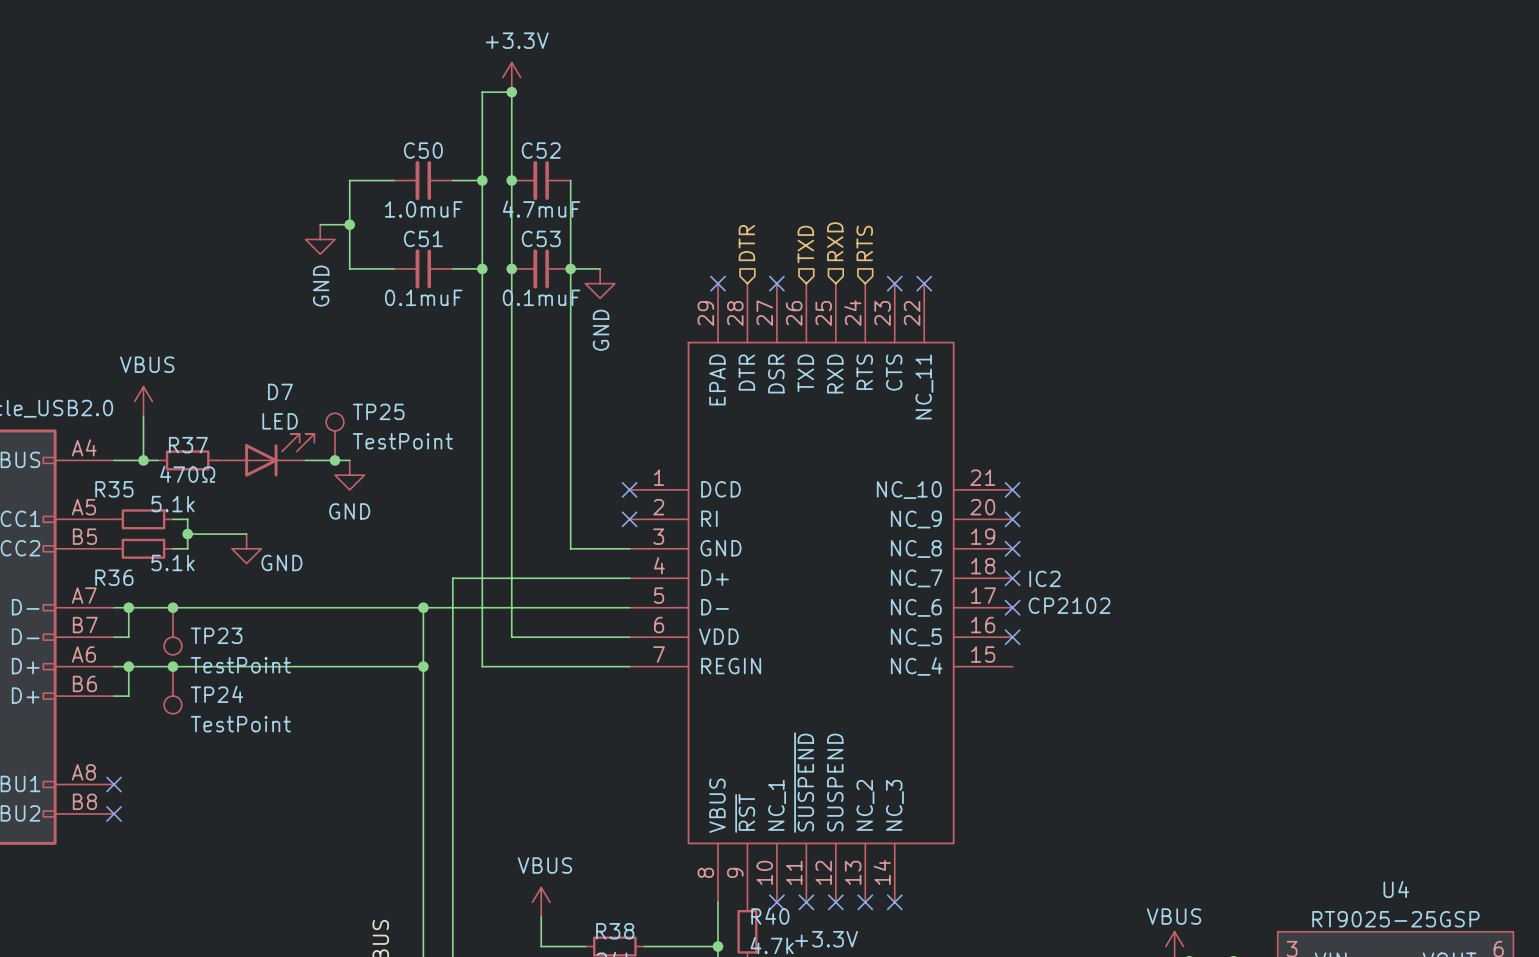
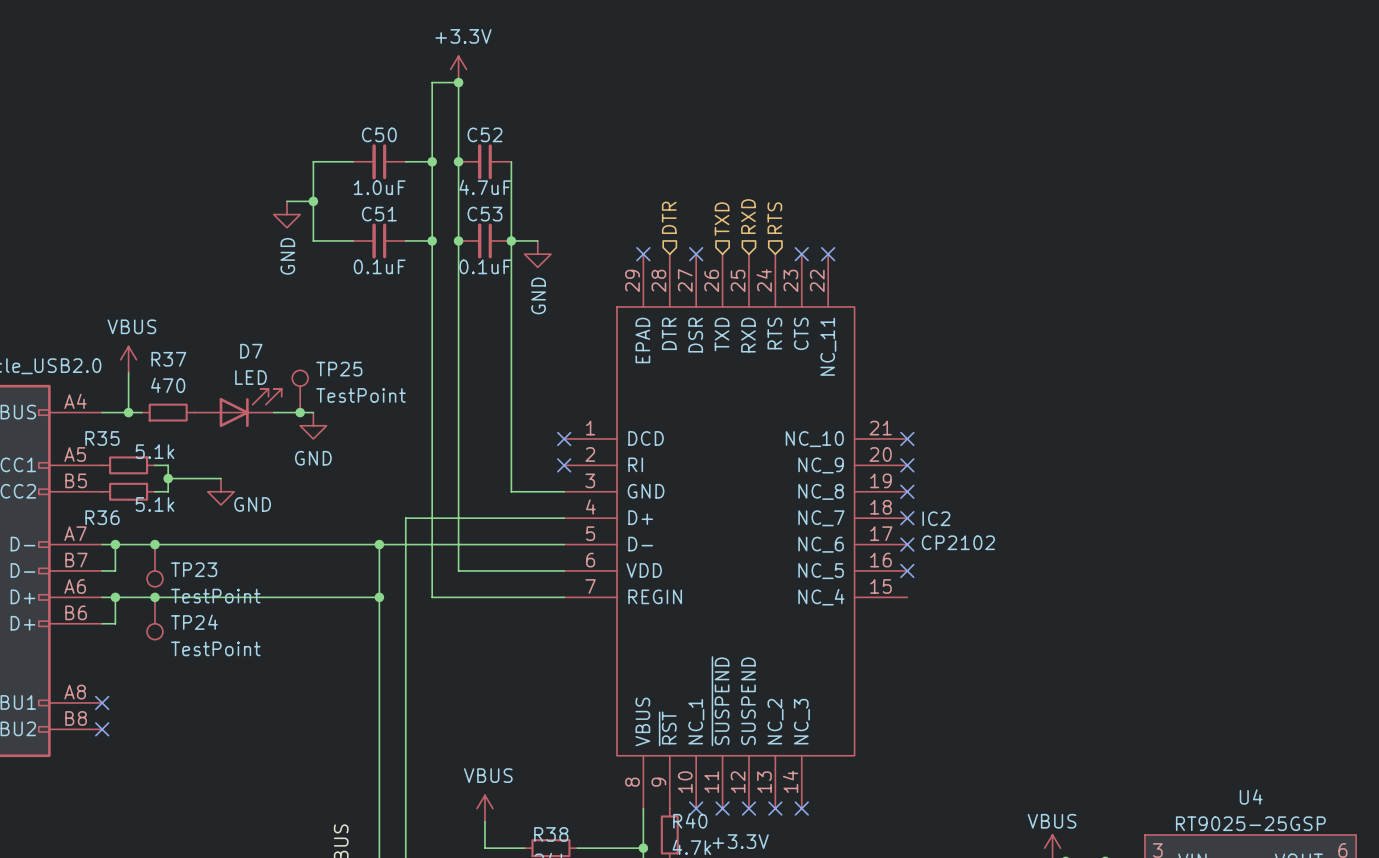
C50 value: 1.0muF (423, 209) -> 1.0uF (379, 187)
C52 value: 4.7muF (541, 209) -> 4.7uF (485, 187)
C51 value: 0.1muF (423, 297) -> 0.1uF (379, 266)
C53 value: 0.1muF (541, 297) -> 0.1uF (485, 266)
R37 name position: R37 (188, 445) -> R37 (168, 359)
R37 value: 470Ω (187, 474) -> 470 (168, 385)

